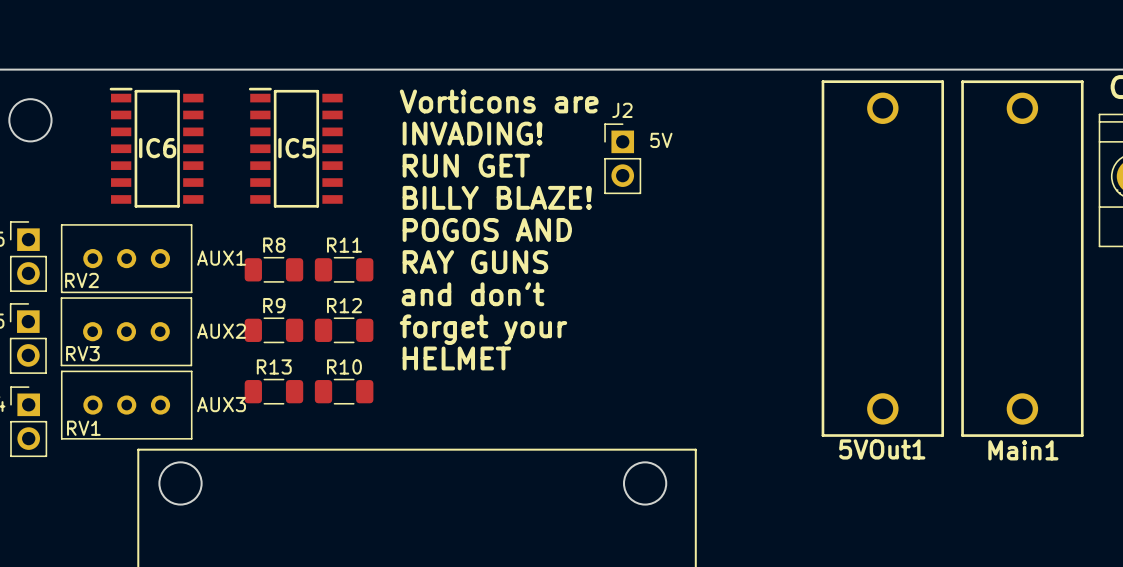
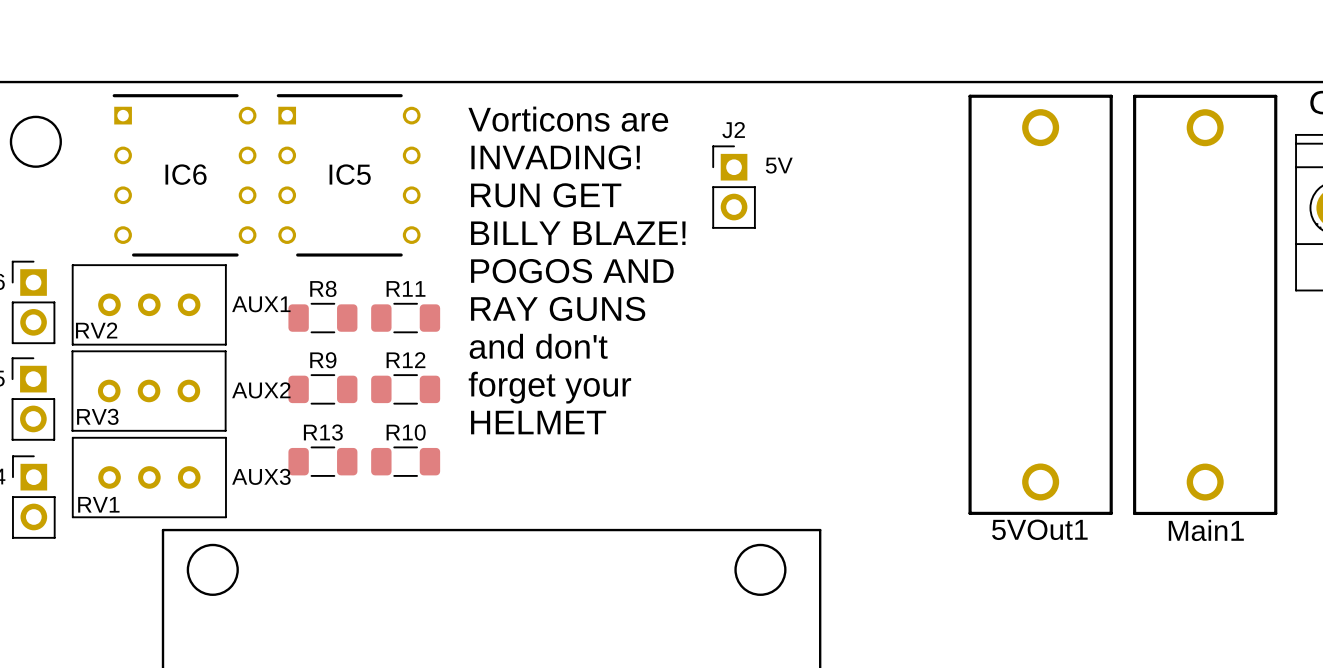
IC6 footprint: [109, 87, 204, 208] -> [112, 94, 257, 257]
IC5 footprint: [248, 87, 343, 208] -> [276, 94, 421, 257]

